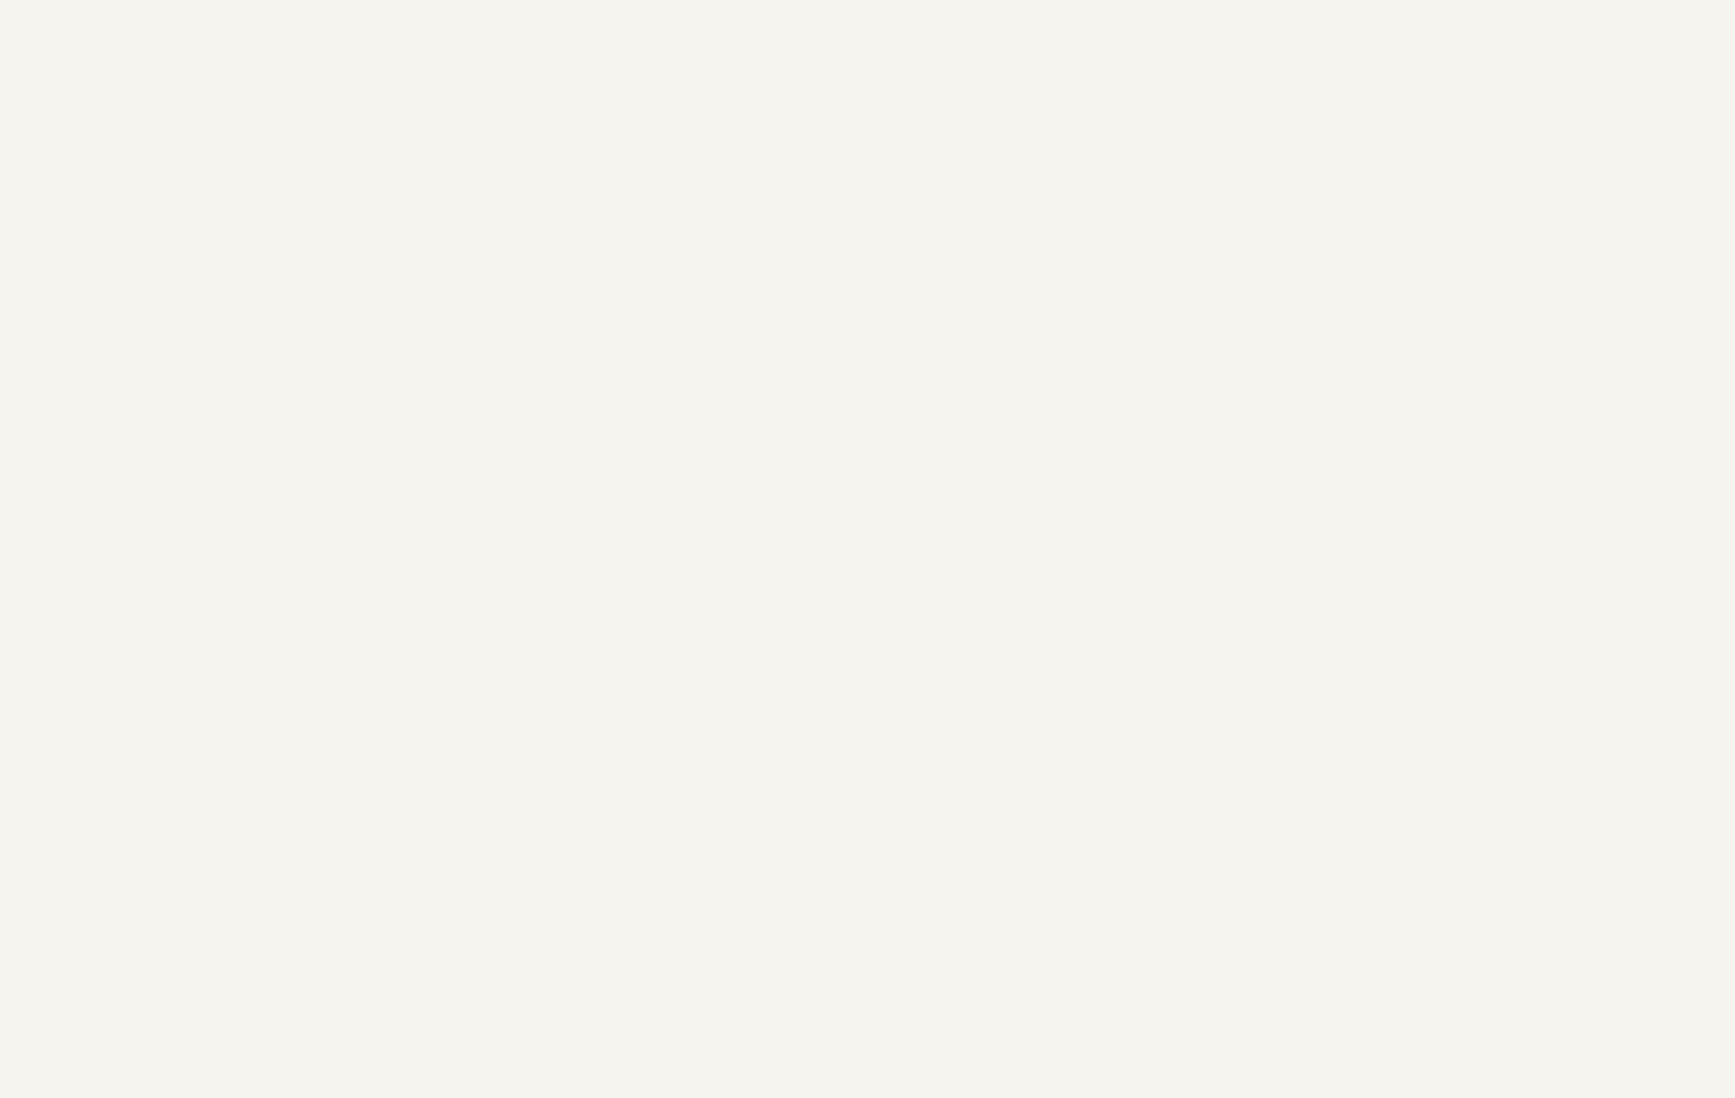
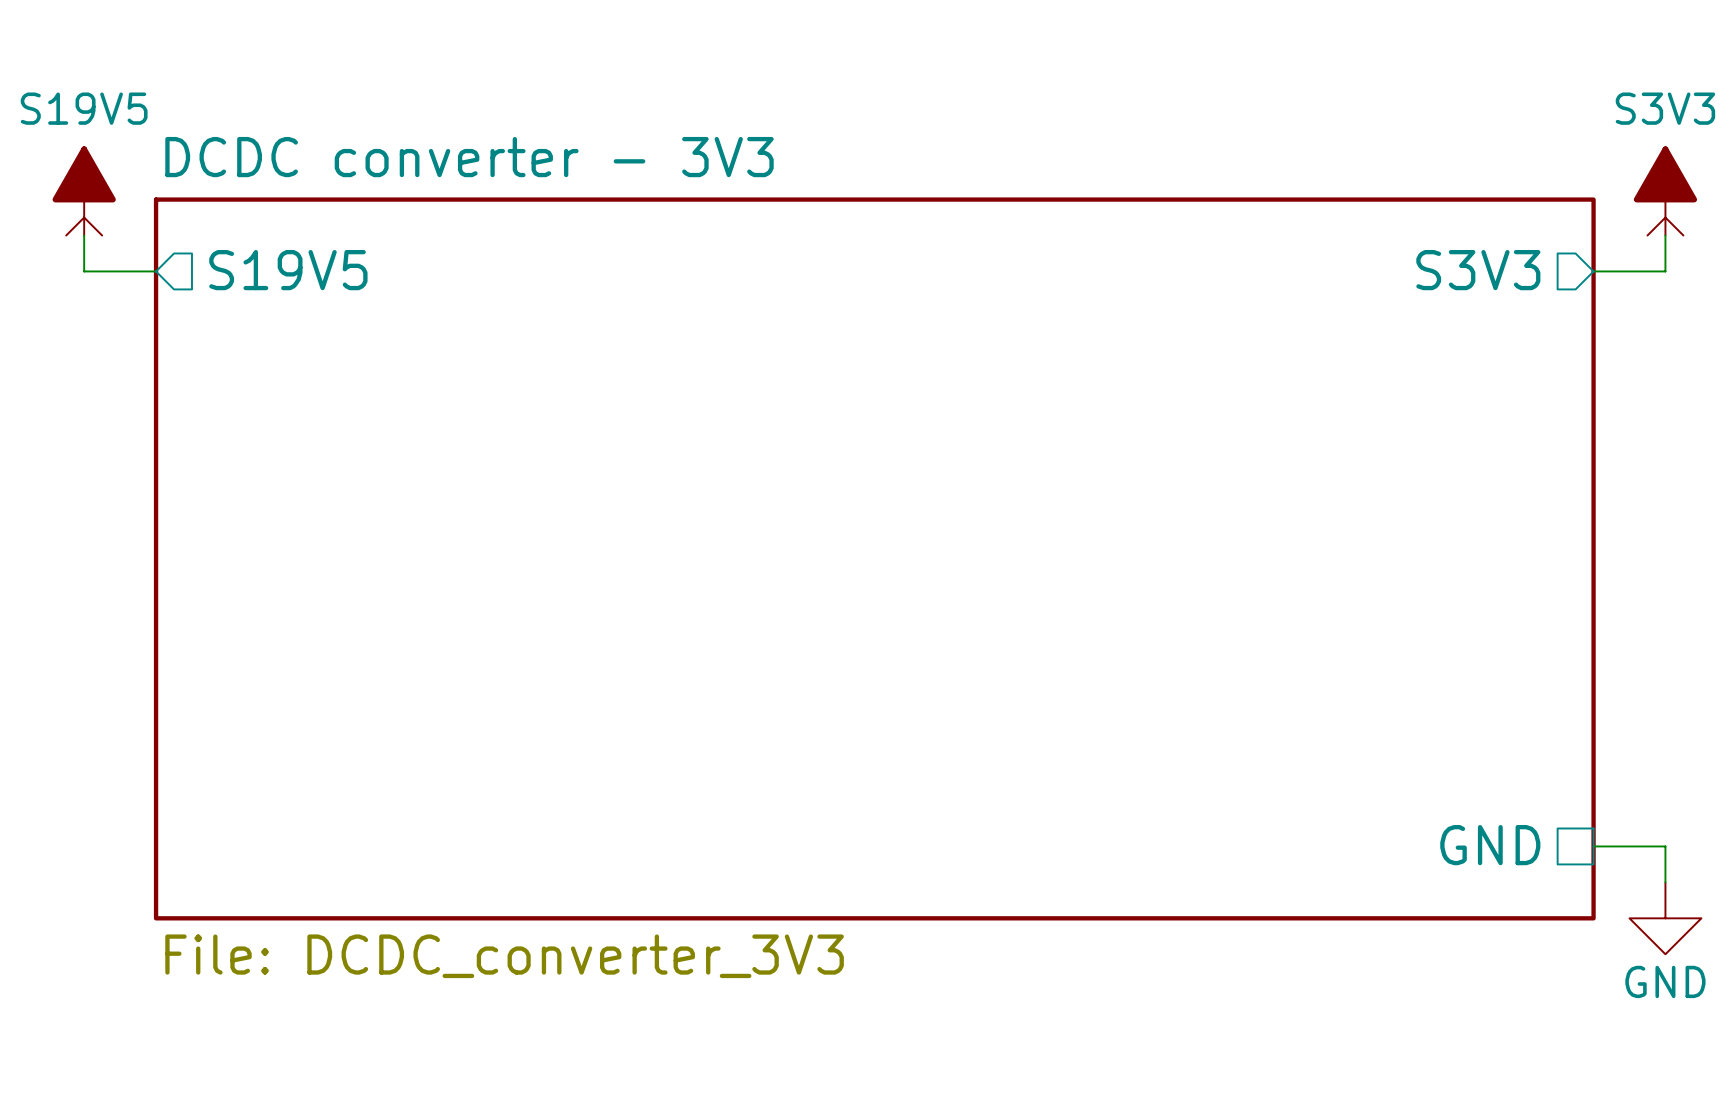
power symbol: none -> S19V5 (84, 190)
power symbol: none -> S3V3 (1665, 190)
wire: none -> (84, 235) (84, 271) (156, 271)
wire: none -> (1665, 235) (1665, 271) (1593, 271)
sheet pin: none -> S19V5 (288, 270)
sheet pin: none -> S3V3 (1478, 270)
sheet DCDC converter - 3V3: none -> File: DCDC_converter_3V3 (874, 558)
sheet pin: none -> GND (1490, 845)
wire: none -> (1593, 846) (1665, 846) (1665, 882)
power symbol: none -> GND (1665, 918)

